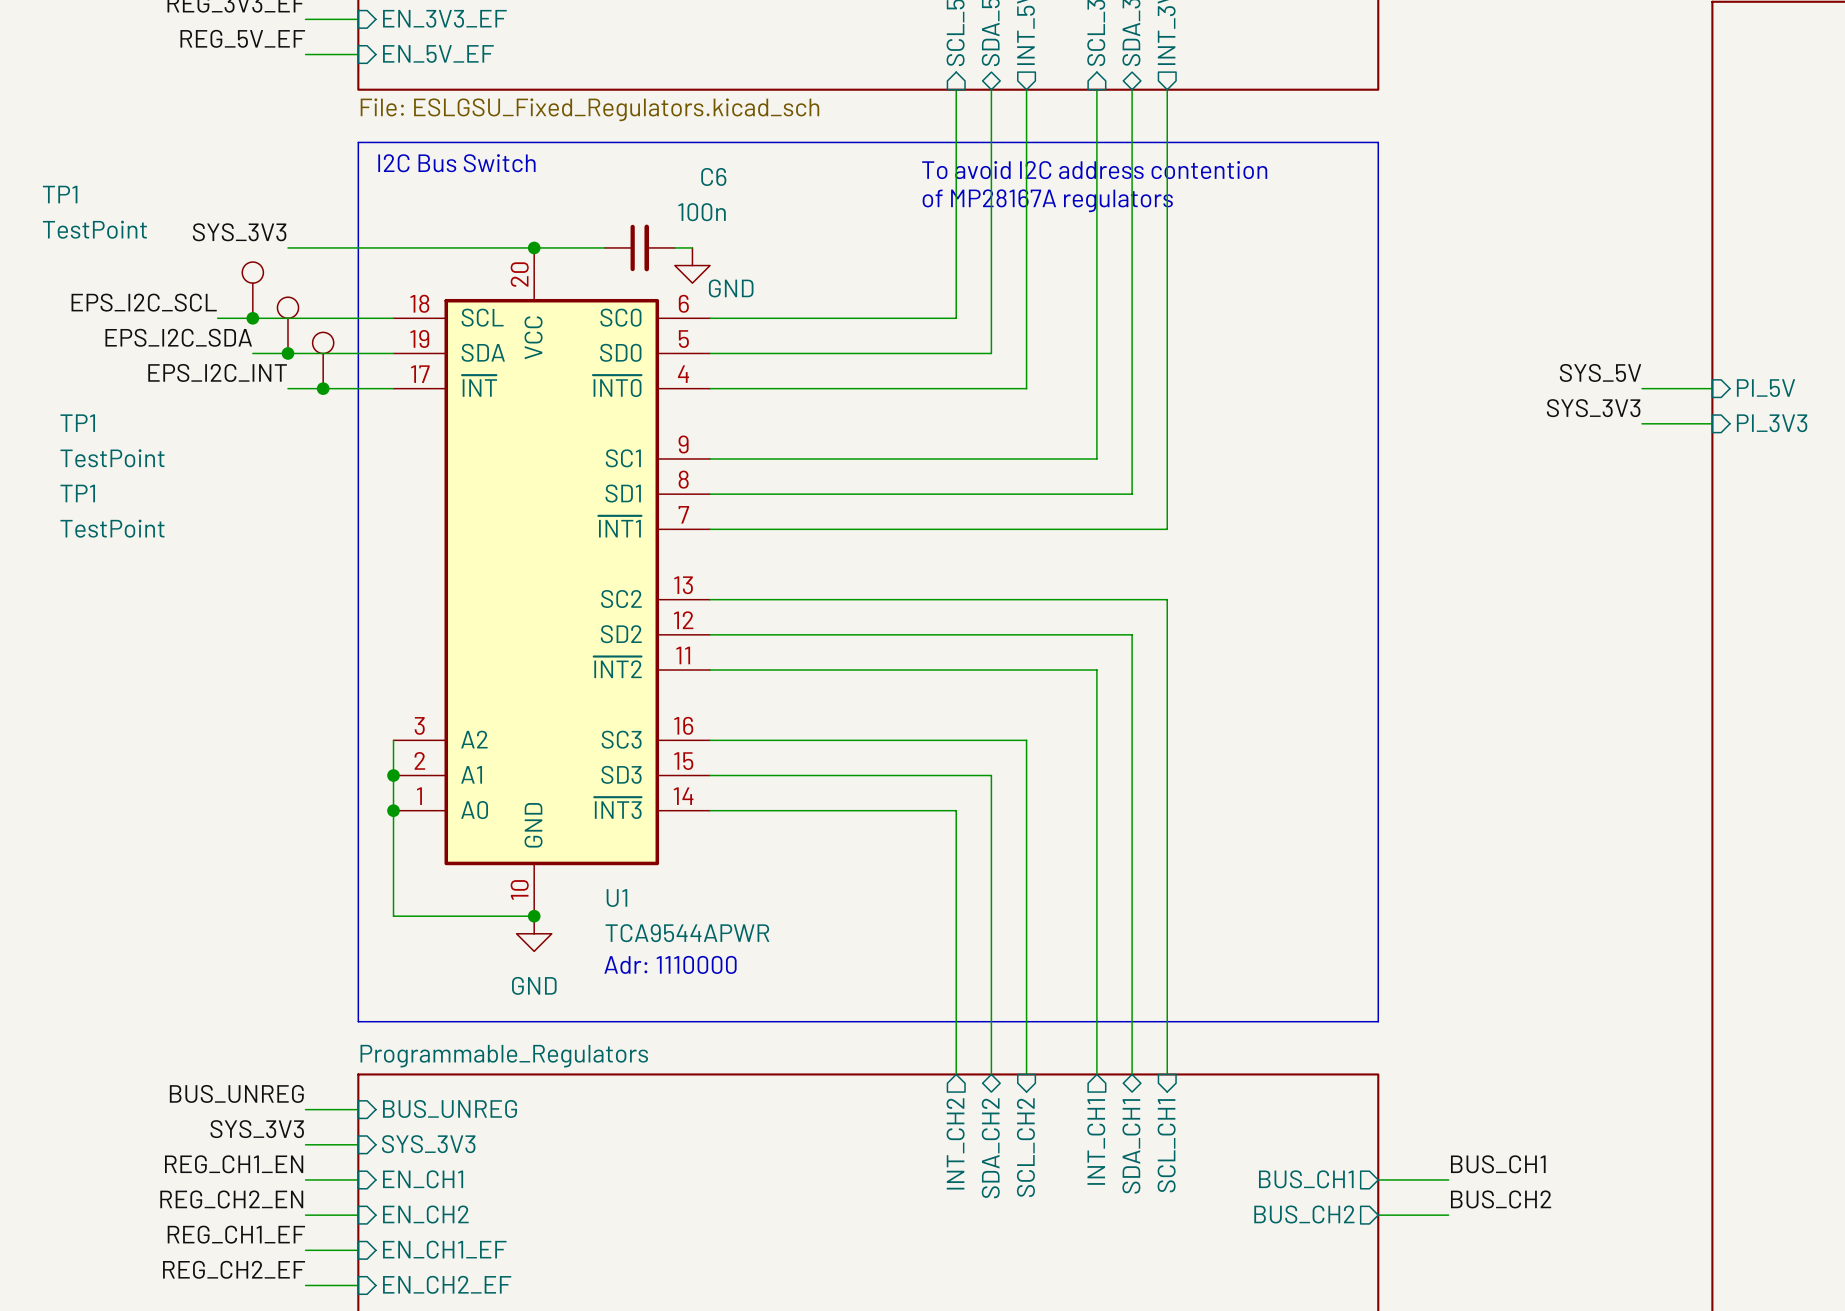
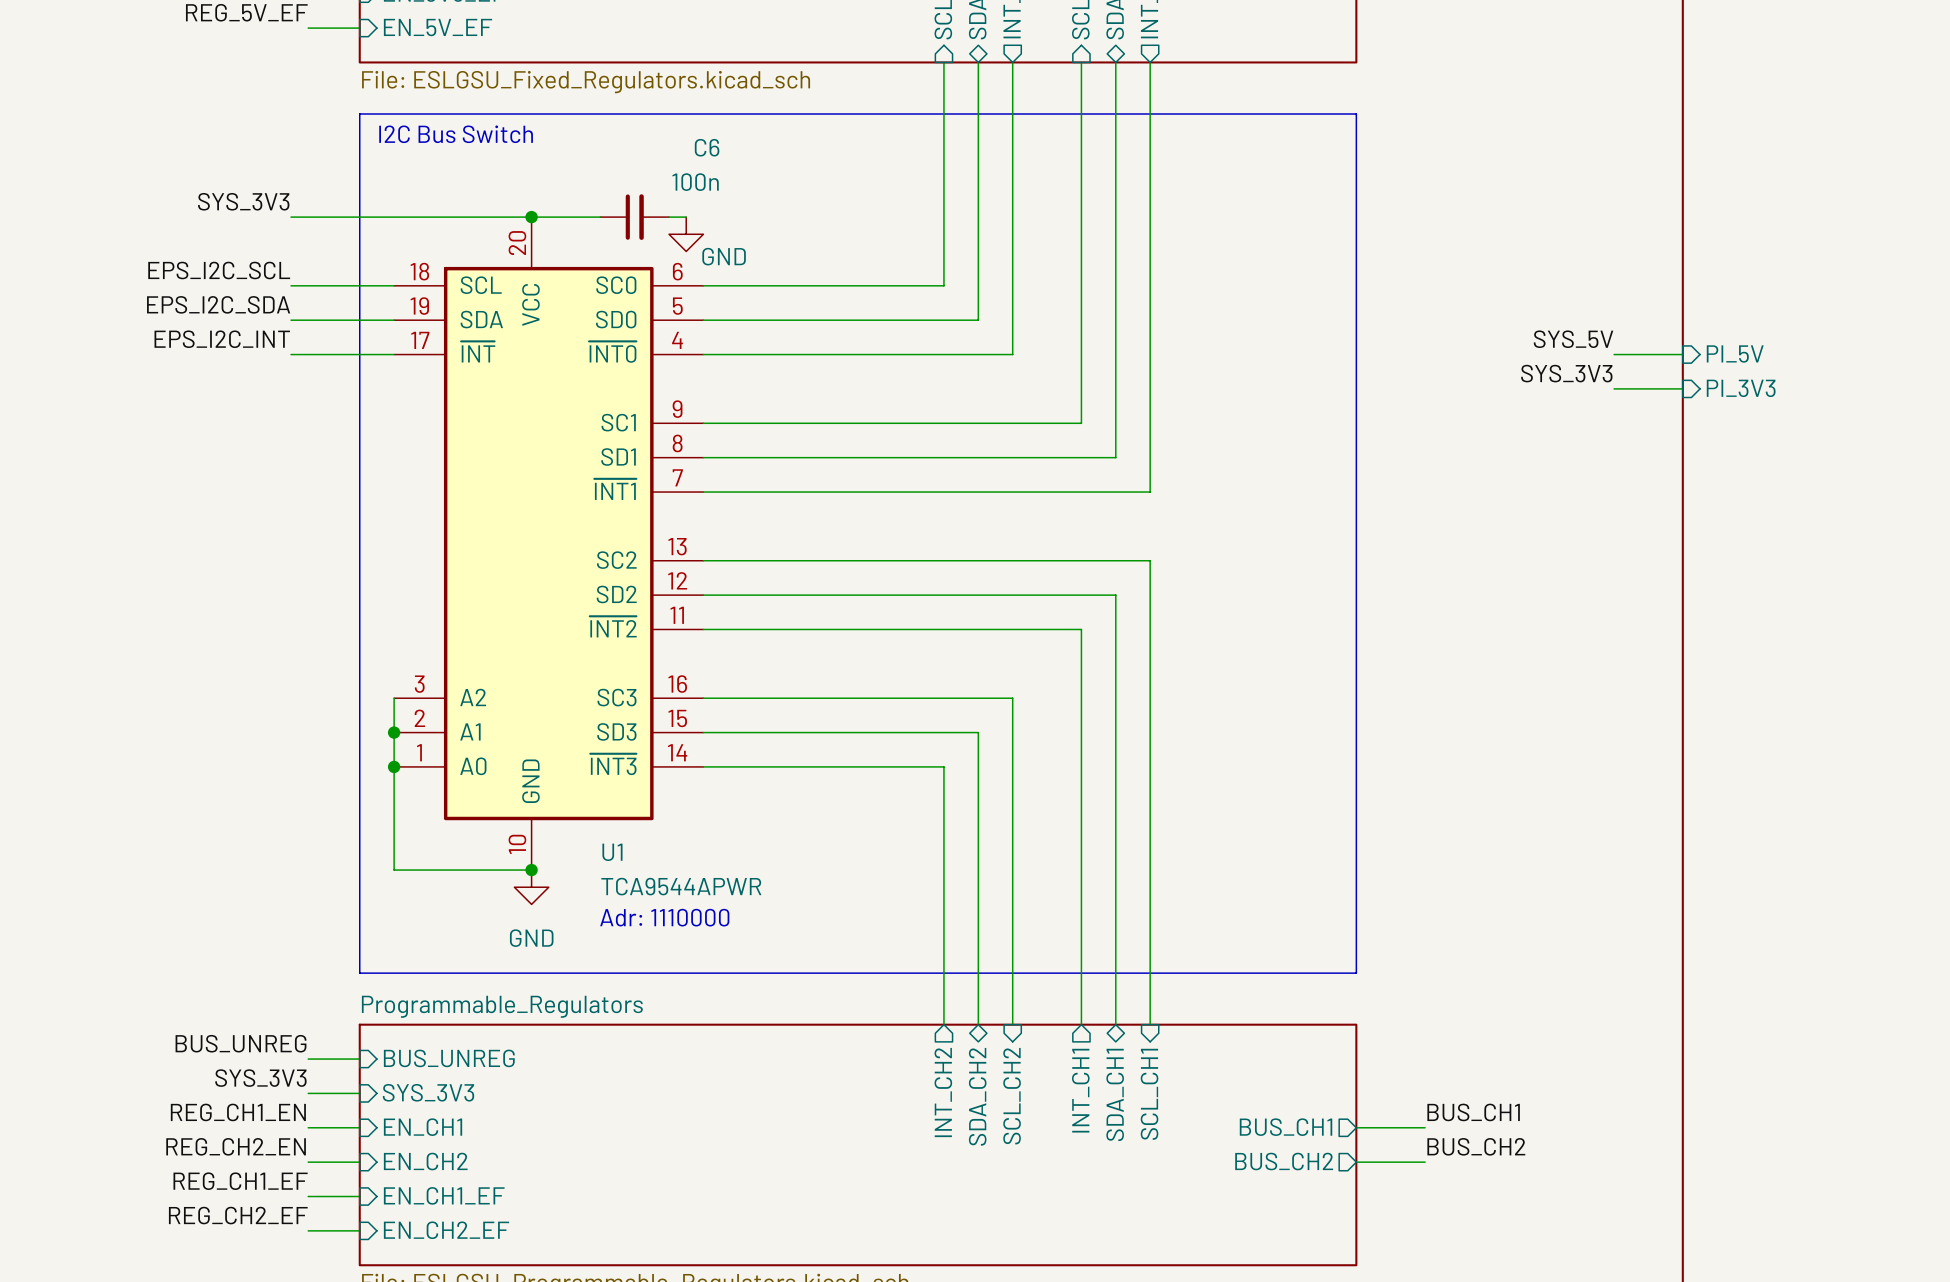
text: To avoid I2C address contention (1094, 170) -> none
text: of MP28167A regulators (1047, 200) -> none
TP1: TestPoint (252, 290) -> none
label position: EPS_I2C_SCL (144, 302) -> EPS_I2C_SCL (219, 270)
wire: (217, 318) (287, 318) -> none
junction: (252, 318) -> none
TP1: TestPoint (287, 325) -> none
label position: EPS_I2C_SDA (178, 337) -> EPS_I2C_SDA (218, 304)
wire: (252, 353) (287, 353) -> none
junction: (287, 353) -> none
TP1: TestPoint (323, 360) -> none
junction: (323, 388) -> none

